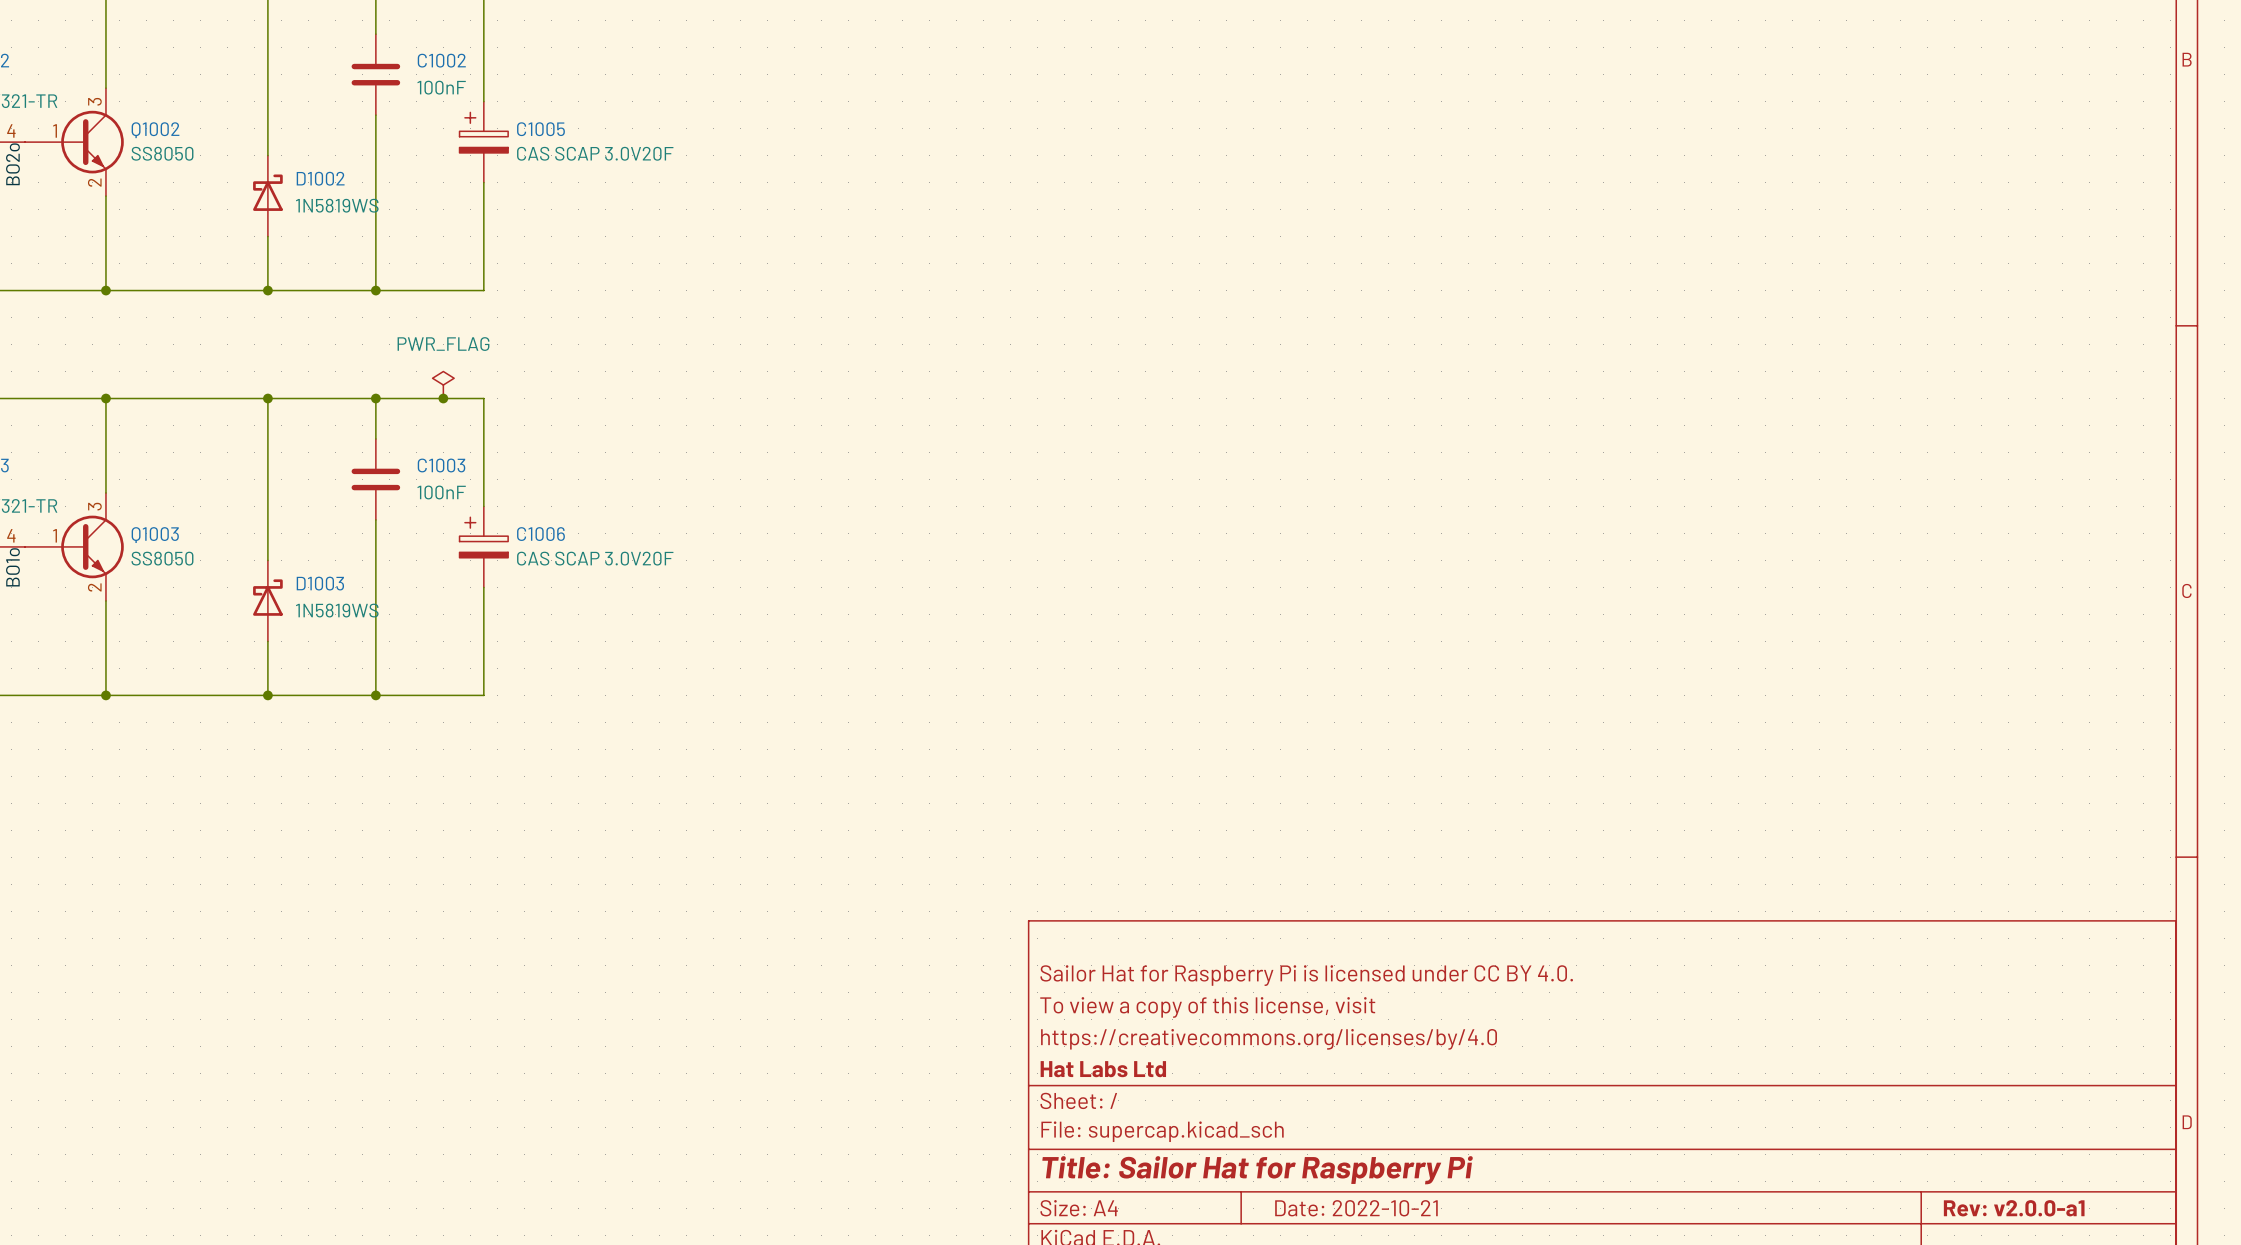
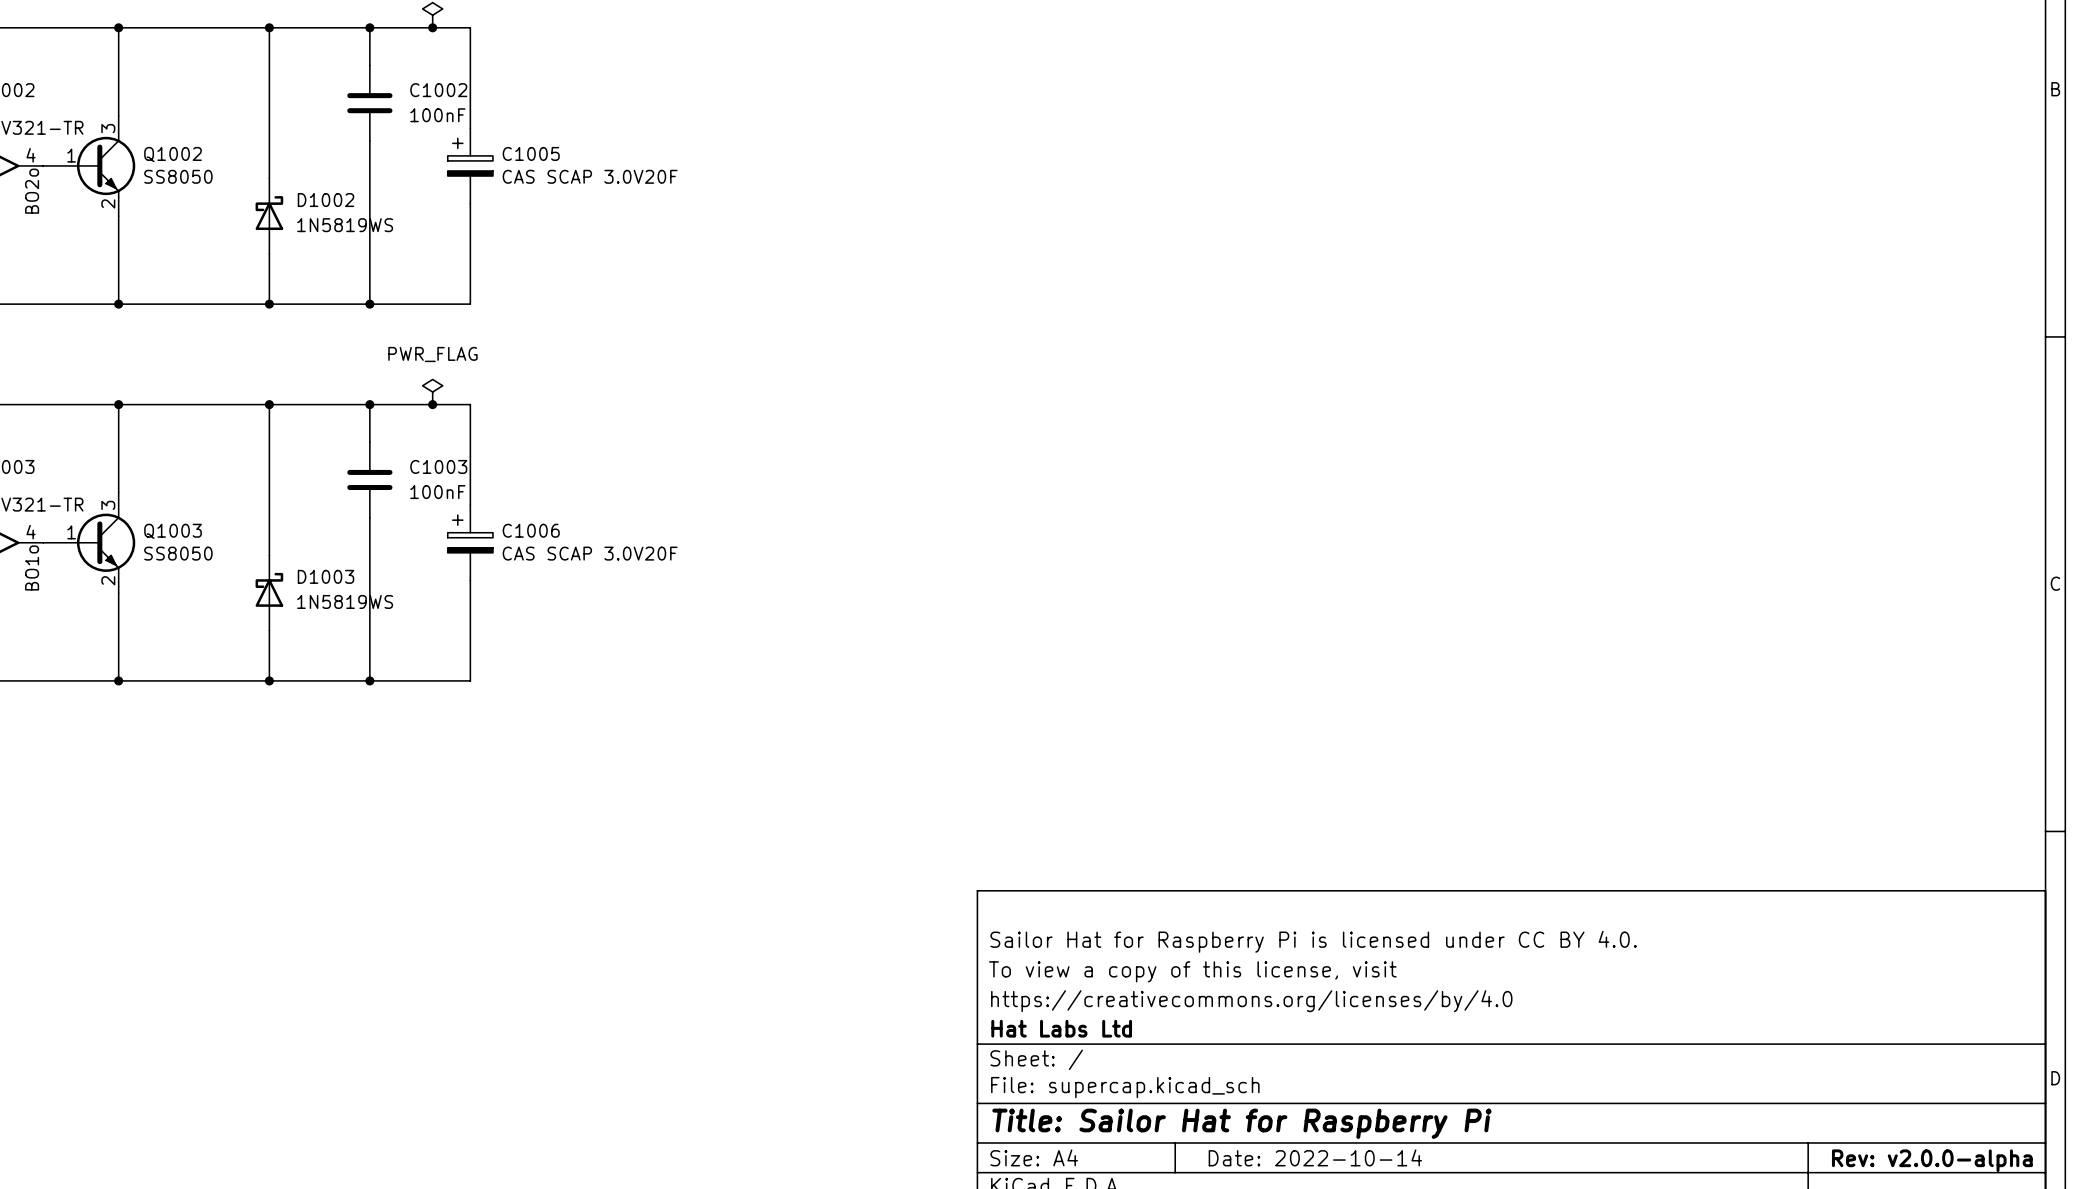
title block: Date: 2022-10-21 (1356, 1208) -> Date: 2022-10-14 (1315, 1157)
title block: Rev: v2.0.0-a1 (2014, 1208) -> Rev: v2.0.0-alpha (1932, 1160)

